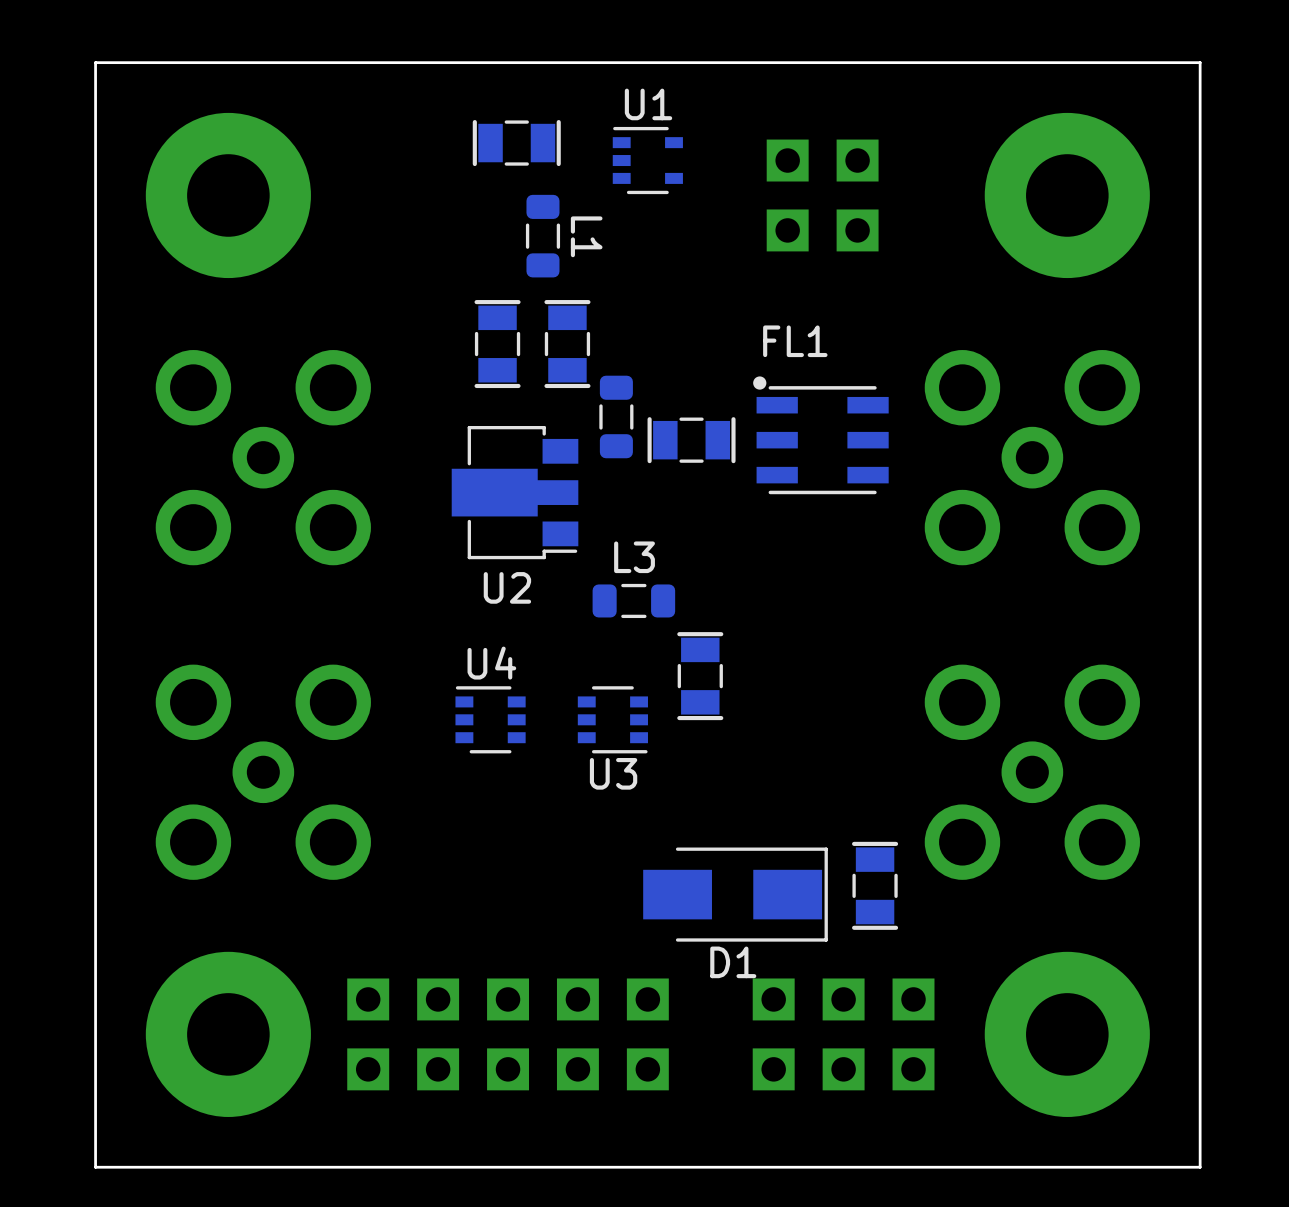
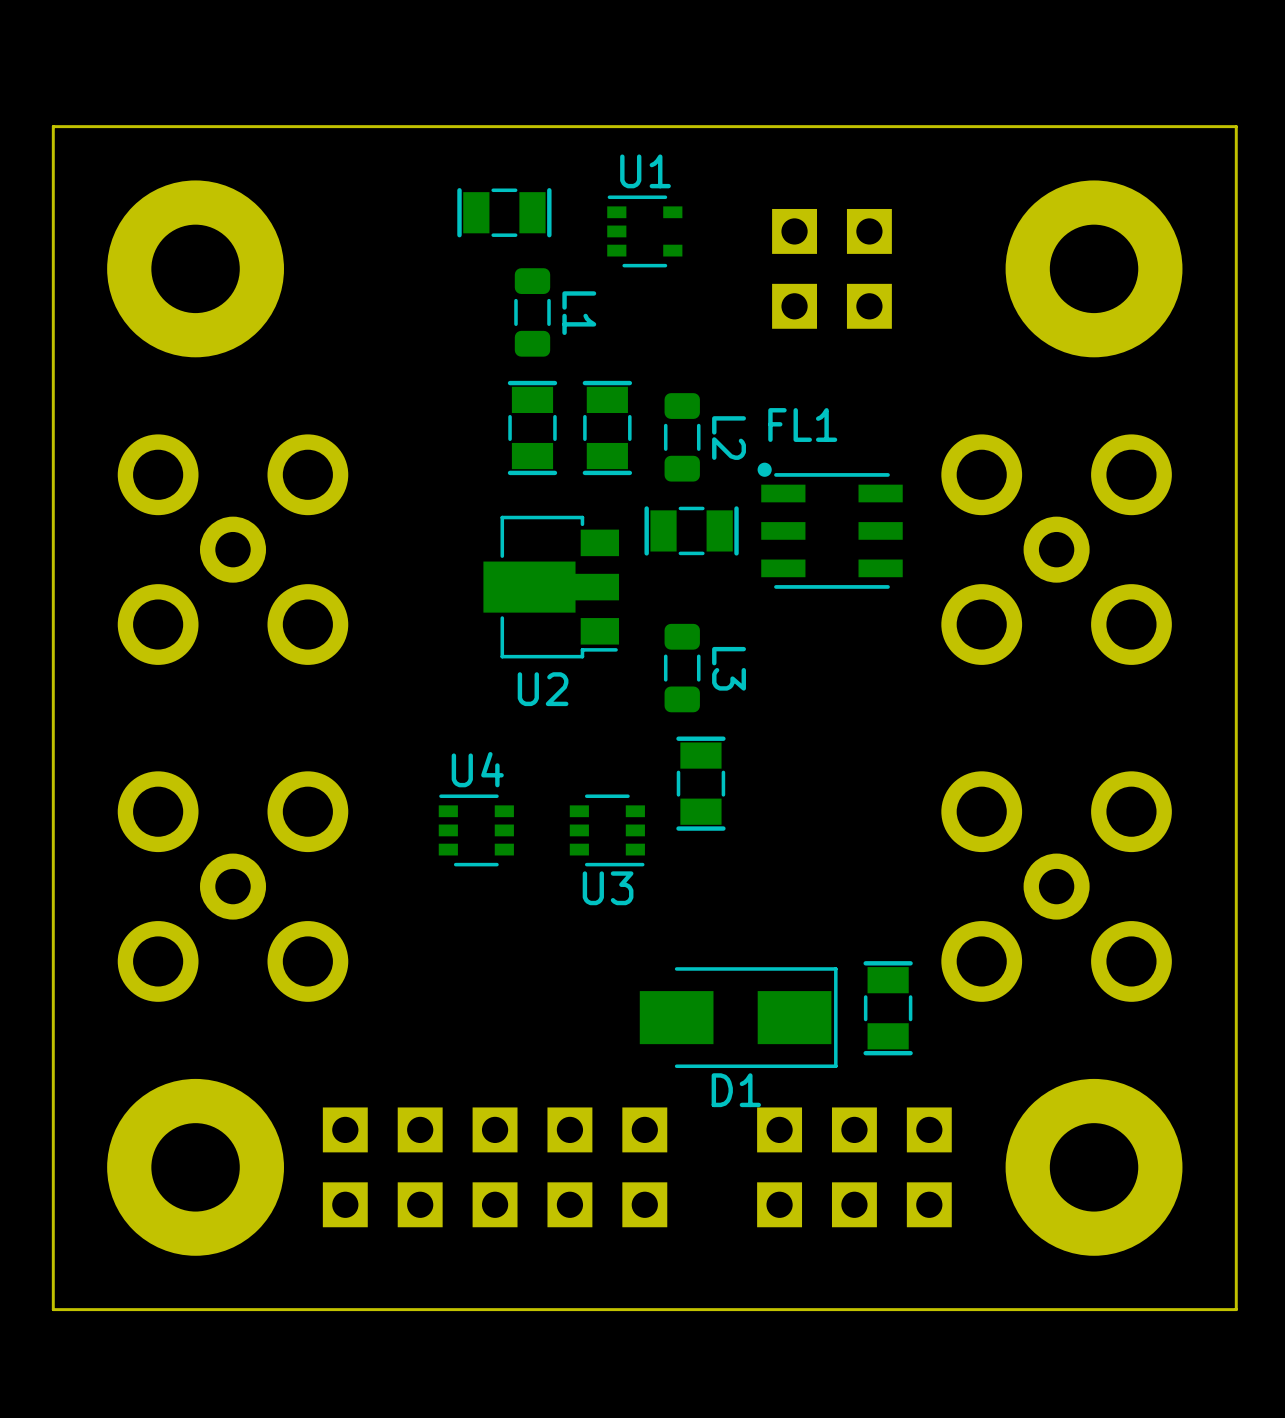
part: (497, 344) -> none
part: none -> (532, 427)
part: (567, 344) -> none
part: none -> (607, 427)
L2: none -> (682, 437)
part: (616, 416) -> none
U2 position: (515, 492) -> (551, 587)
L3 rotation: 0° (633, 600) -> 90° clockwise (682, 668)
L3 position: (633, 600) -> (682, 668)

